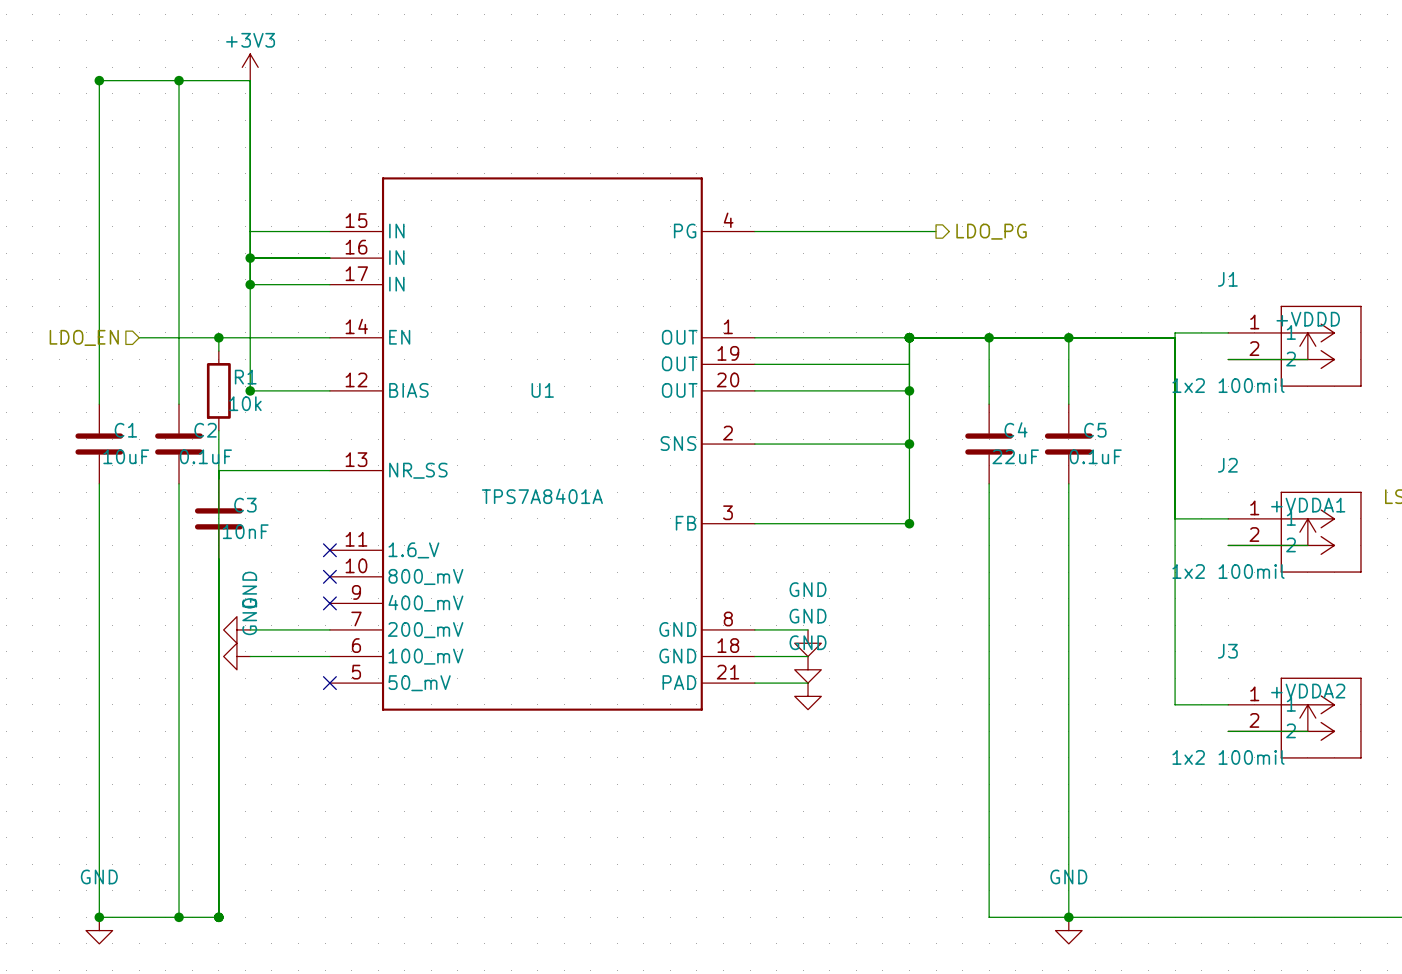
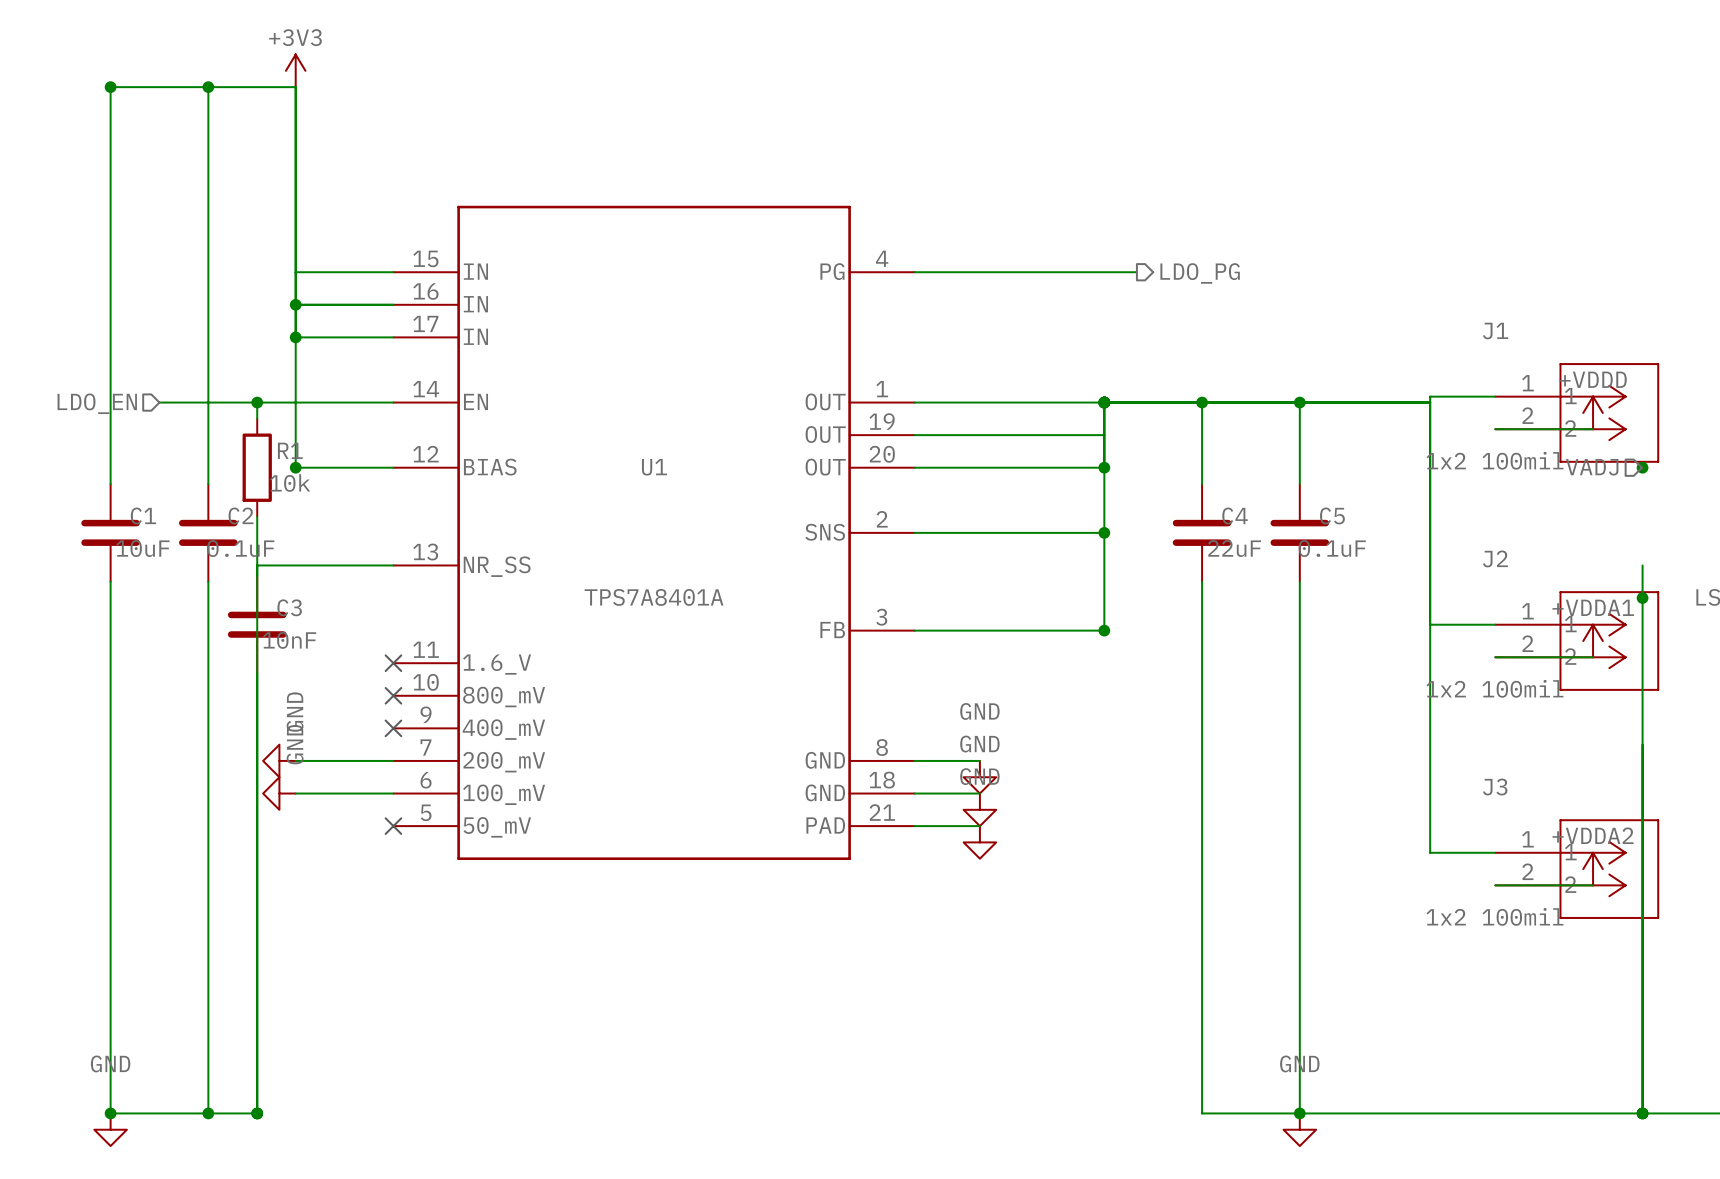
hierarchical label: none -> VADJ (1592, 467)
junction: none -> (1642, 467)
wire: none -> (1642, 565) (1642, 1113)
junction: none -> (1642, 598)
junction: none -> (1642, 1113)

